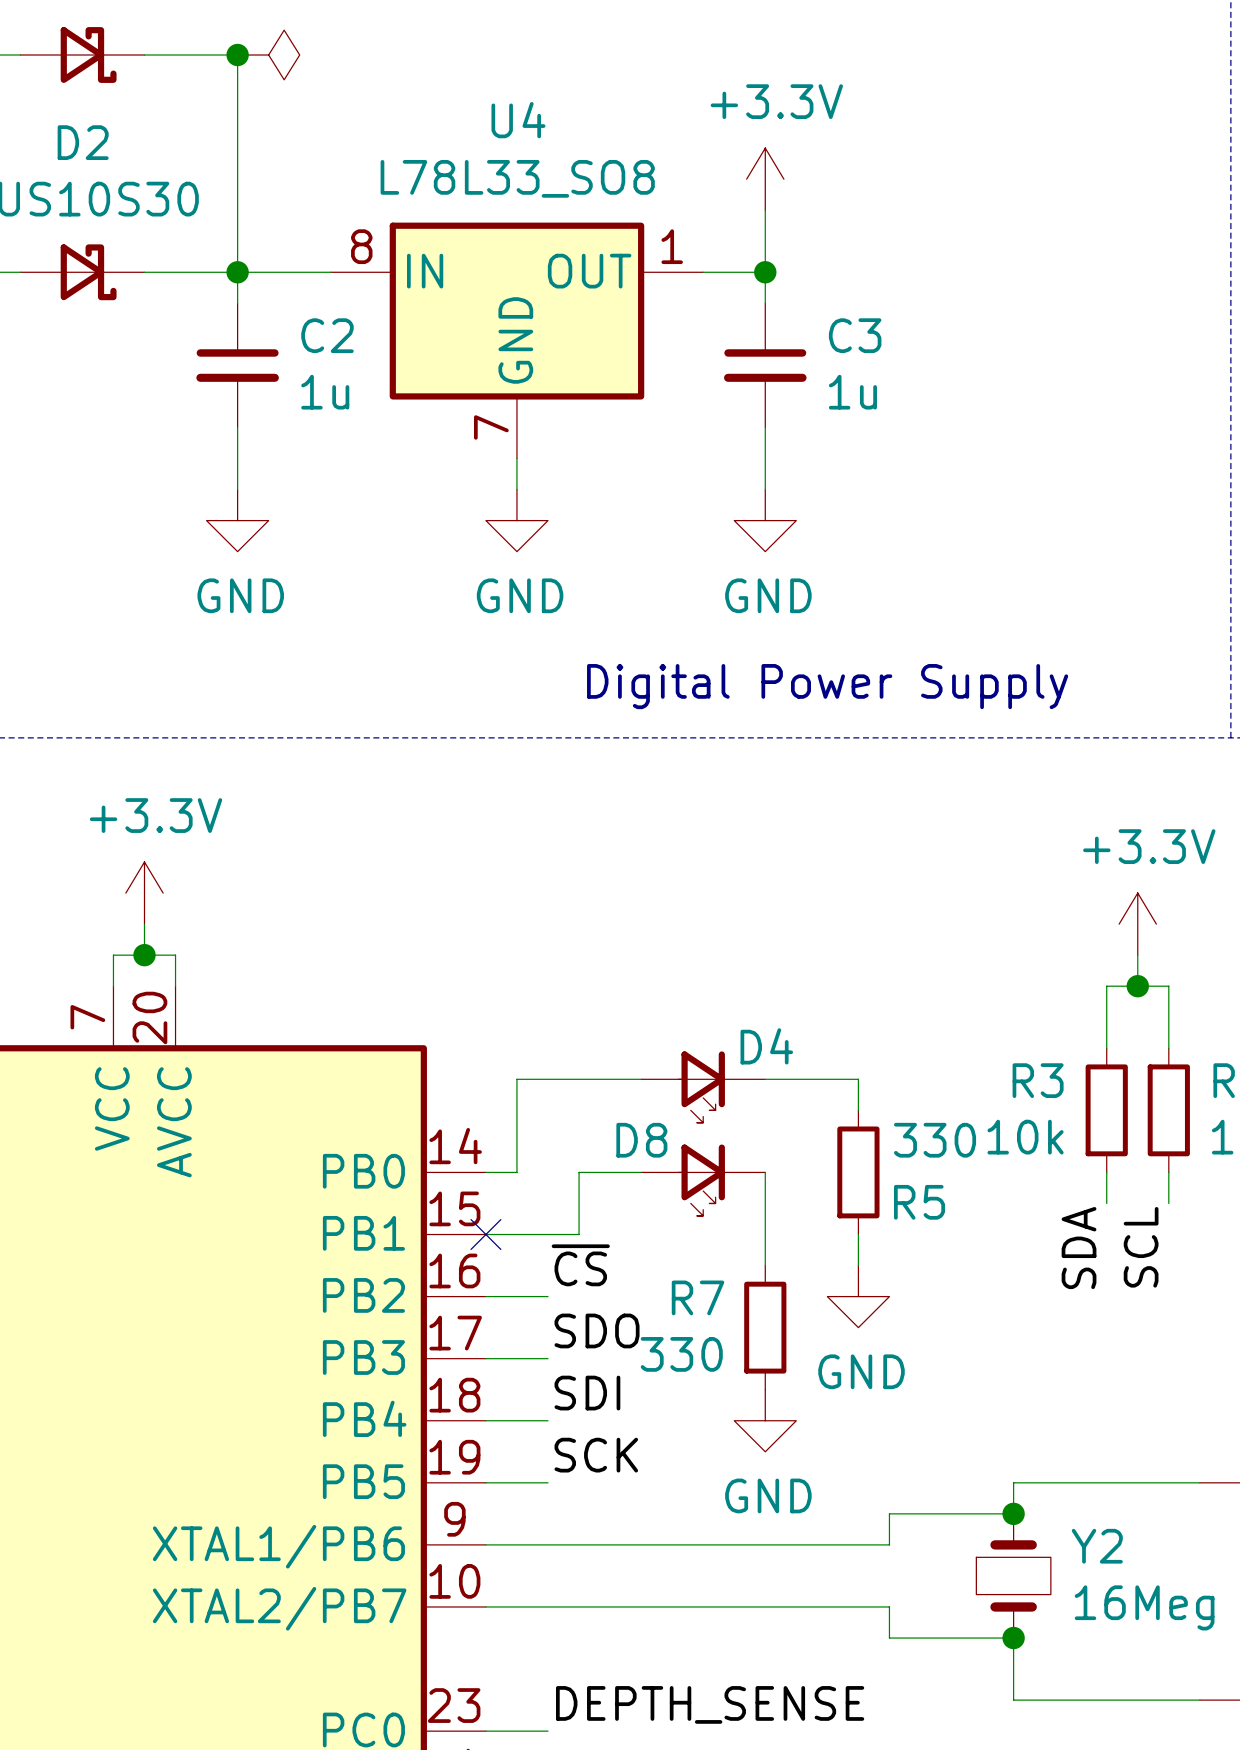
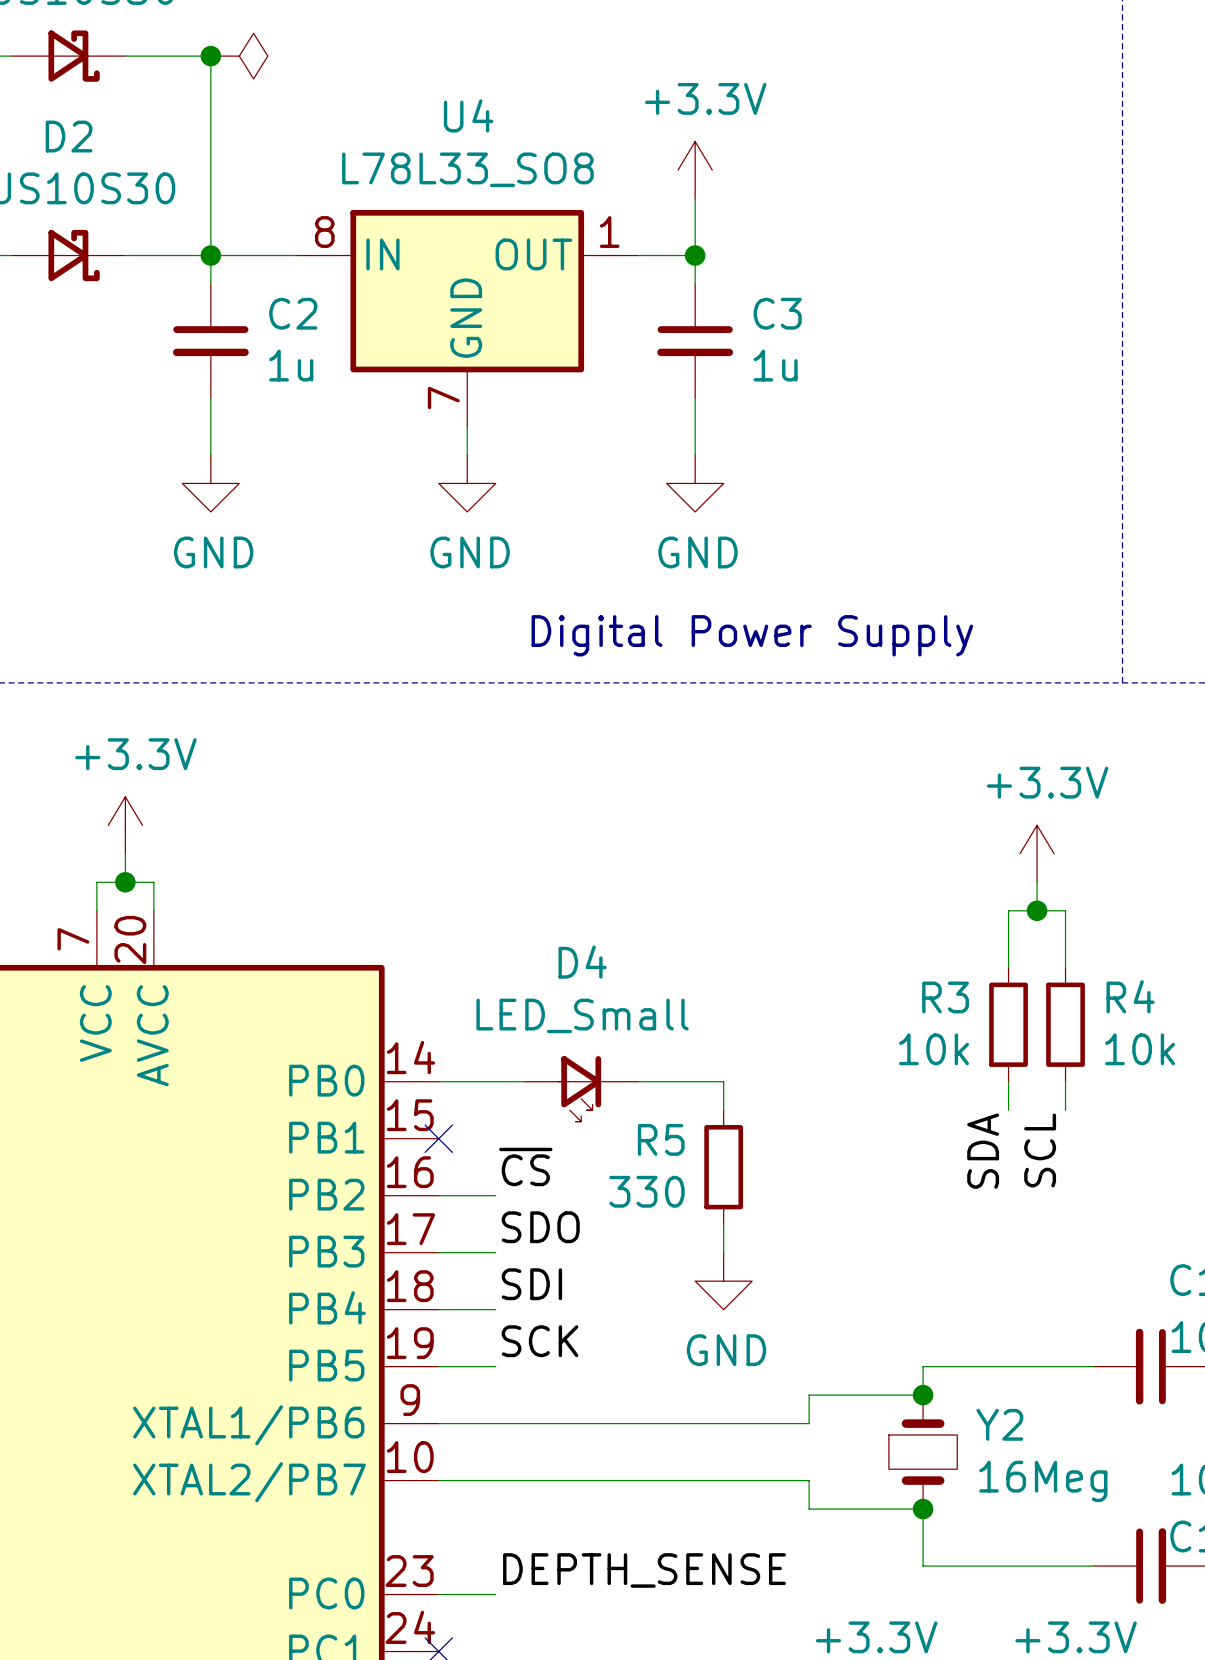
D4 name position: D4 (766, 1046) -> D4 (582, 962)
wire: (641, 1079) (516, 1079) (516, 1172) -> (524, 1081) (467, 1081)
wire: (765, 1079) (858, 1079) (858, 1110) -> (638, 1081) (723, 1081) (723, 1110)
D4 position: (703, 1087) -> (581, 1088)
D4 value: none -> LED_Small (582, 1015)
R5 value position: 330 (935, 1140) -> 330 (646, 1191)
wire: (641, 1172) (579, 1172) (579, 1234) (485, 1234) -> none
wire: (765, 1172) (765, 1265) -> none
R5 position: (858, 1172) -> (723, 1167)
D8: (703, 1180) -> none
R5 name position: R5 (919, 1202) -> R5 (661, 1139)
wire: (858, 1234) (858, 1265) -> (723, 1224) (723, 1252)
power symbol: GND (858, 1296) -> none
R7: 330 (765, 1327) -> none
power symbol position: GND (765, 1420) -> GND (723, 1281)

